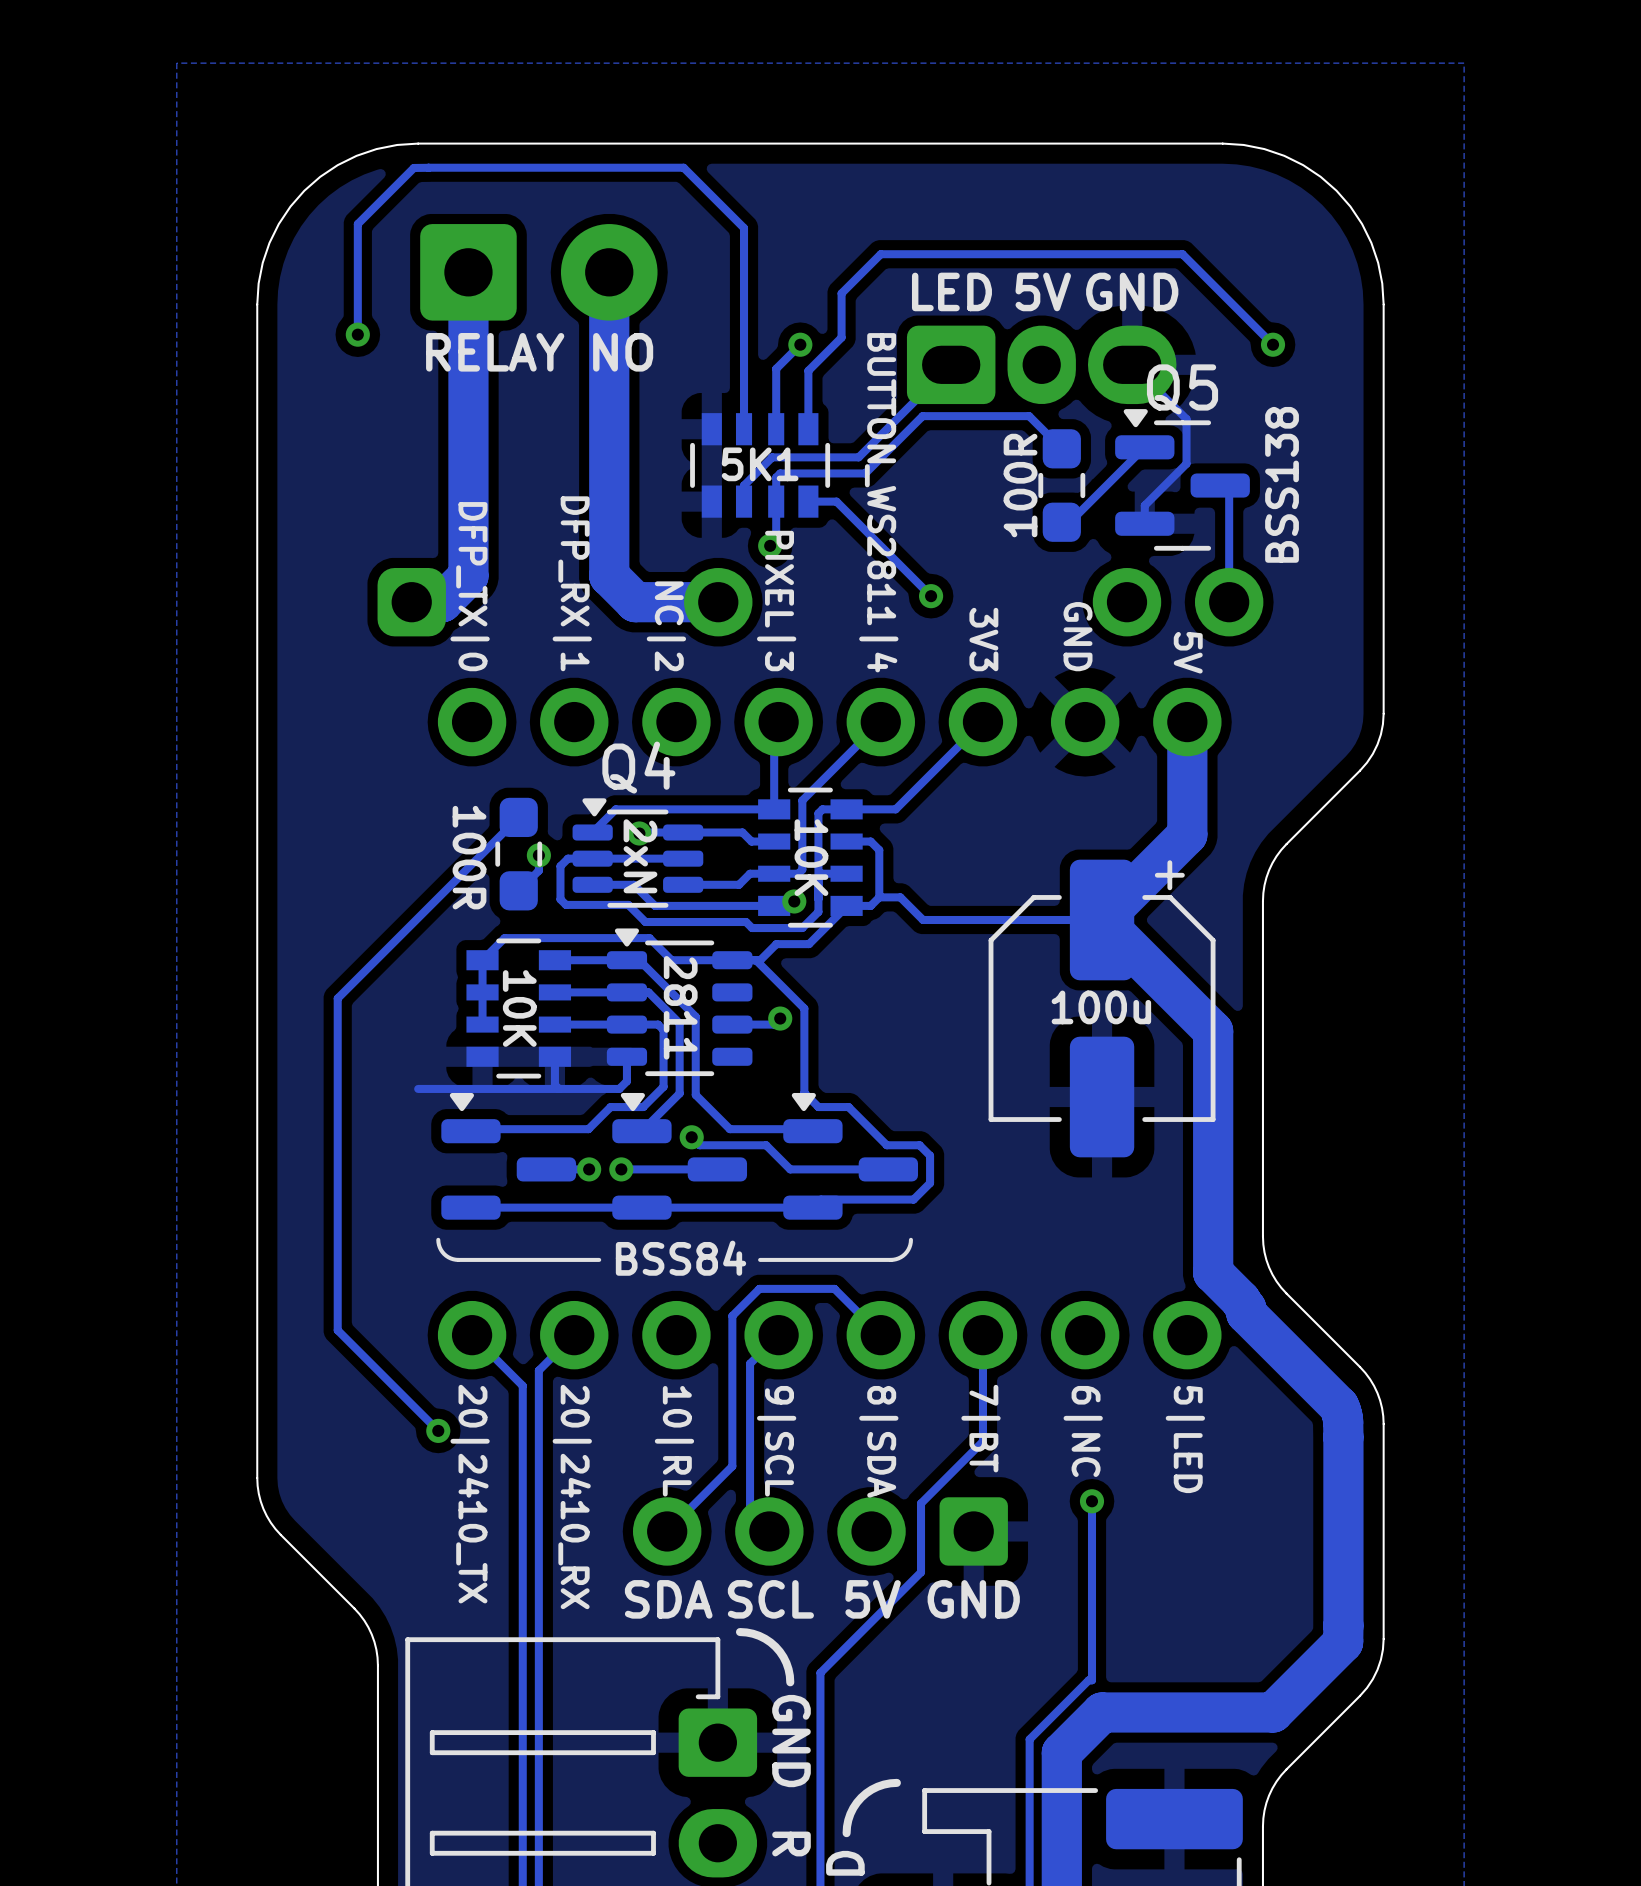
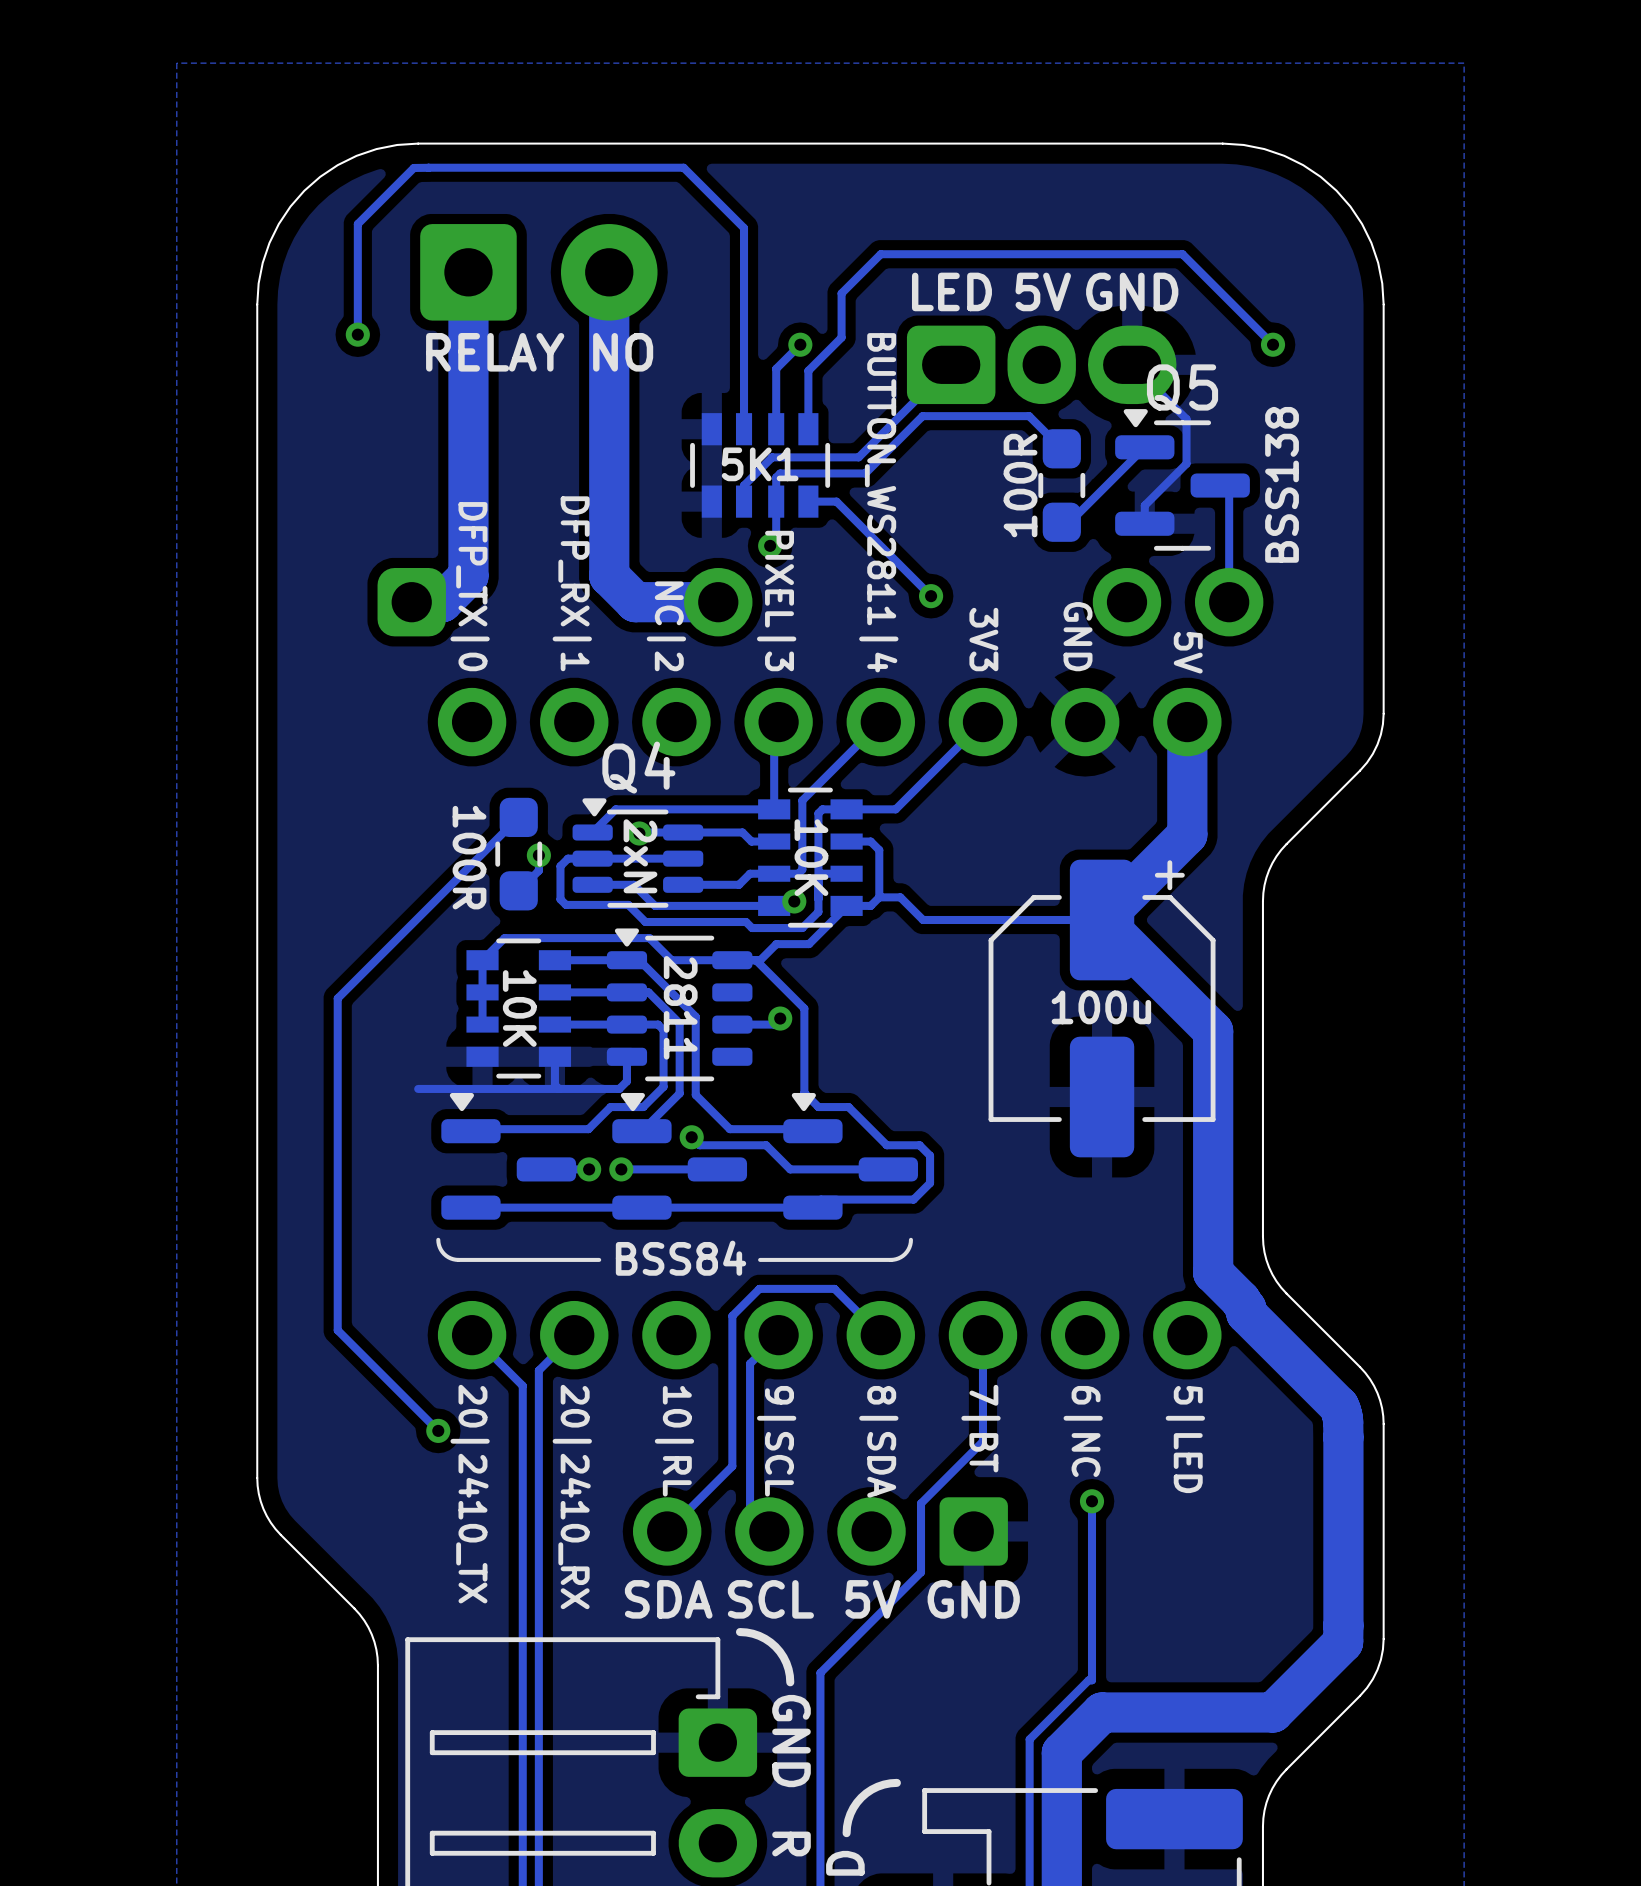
part footprint: [606, 928, 753, 1077] -> [606, 928, 753, 1082]

